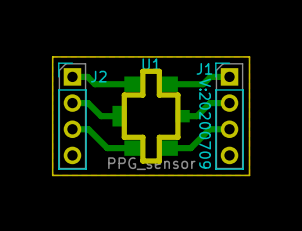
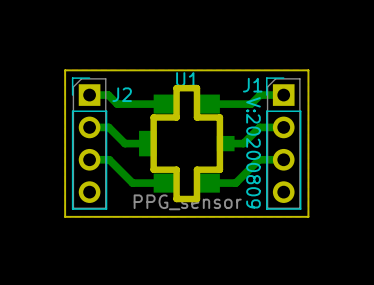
drawing shape: [199, 78, 212, 169] -> [246, 97, 261, 209]

